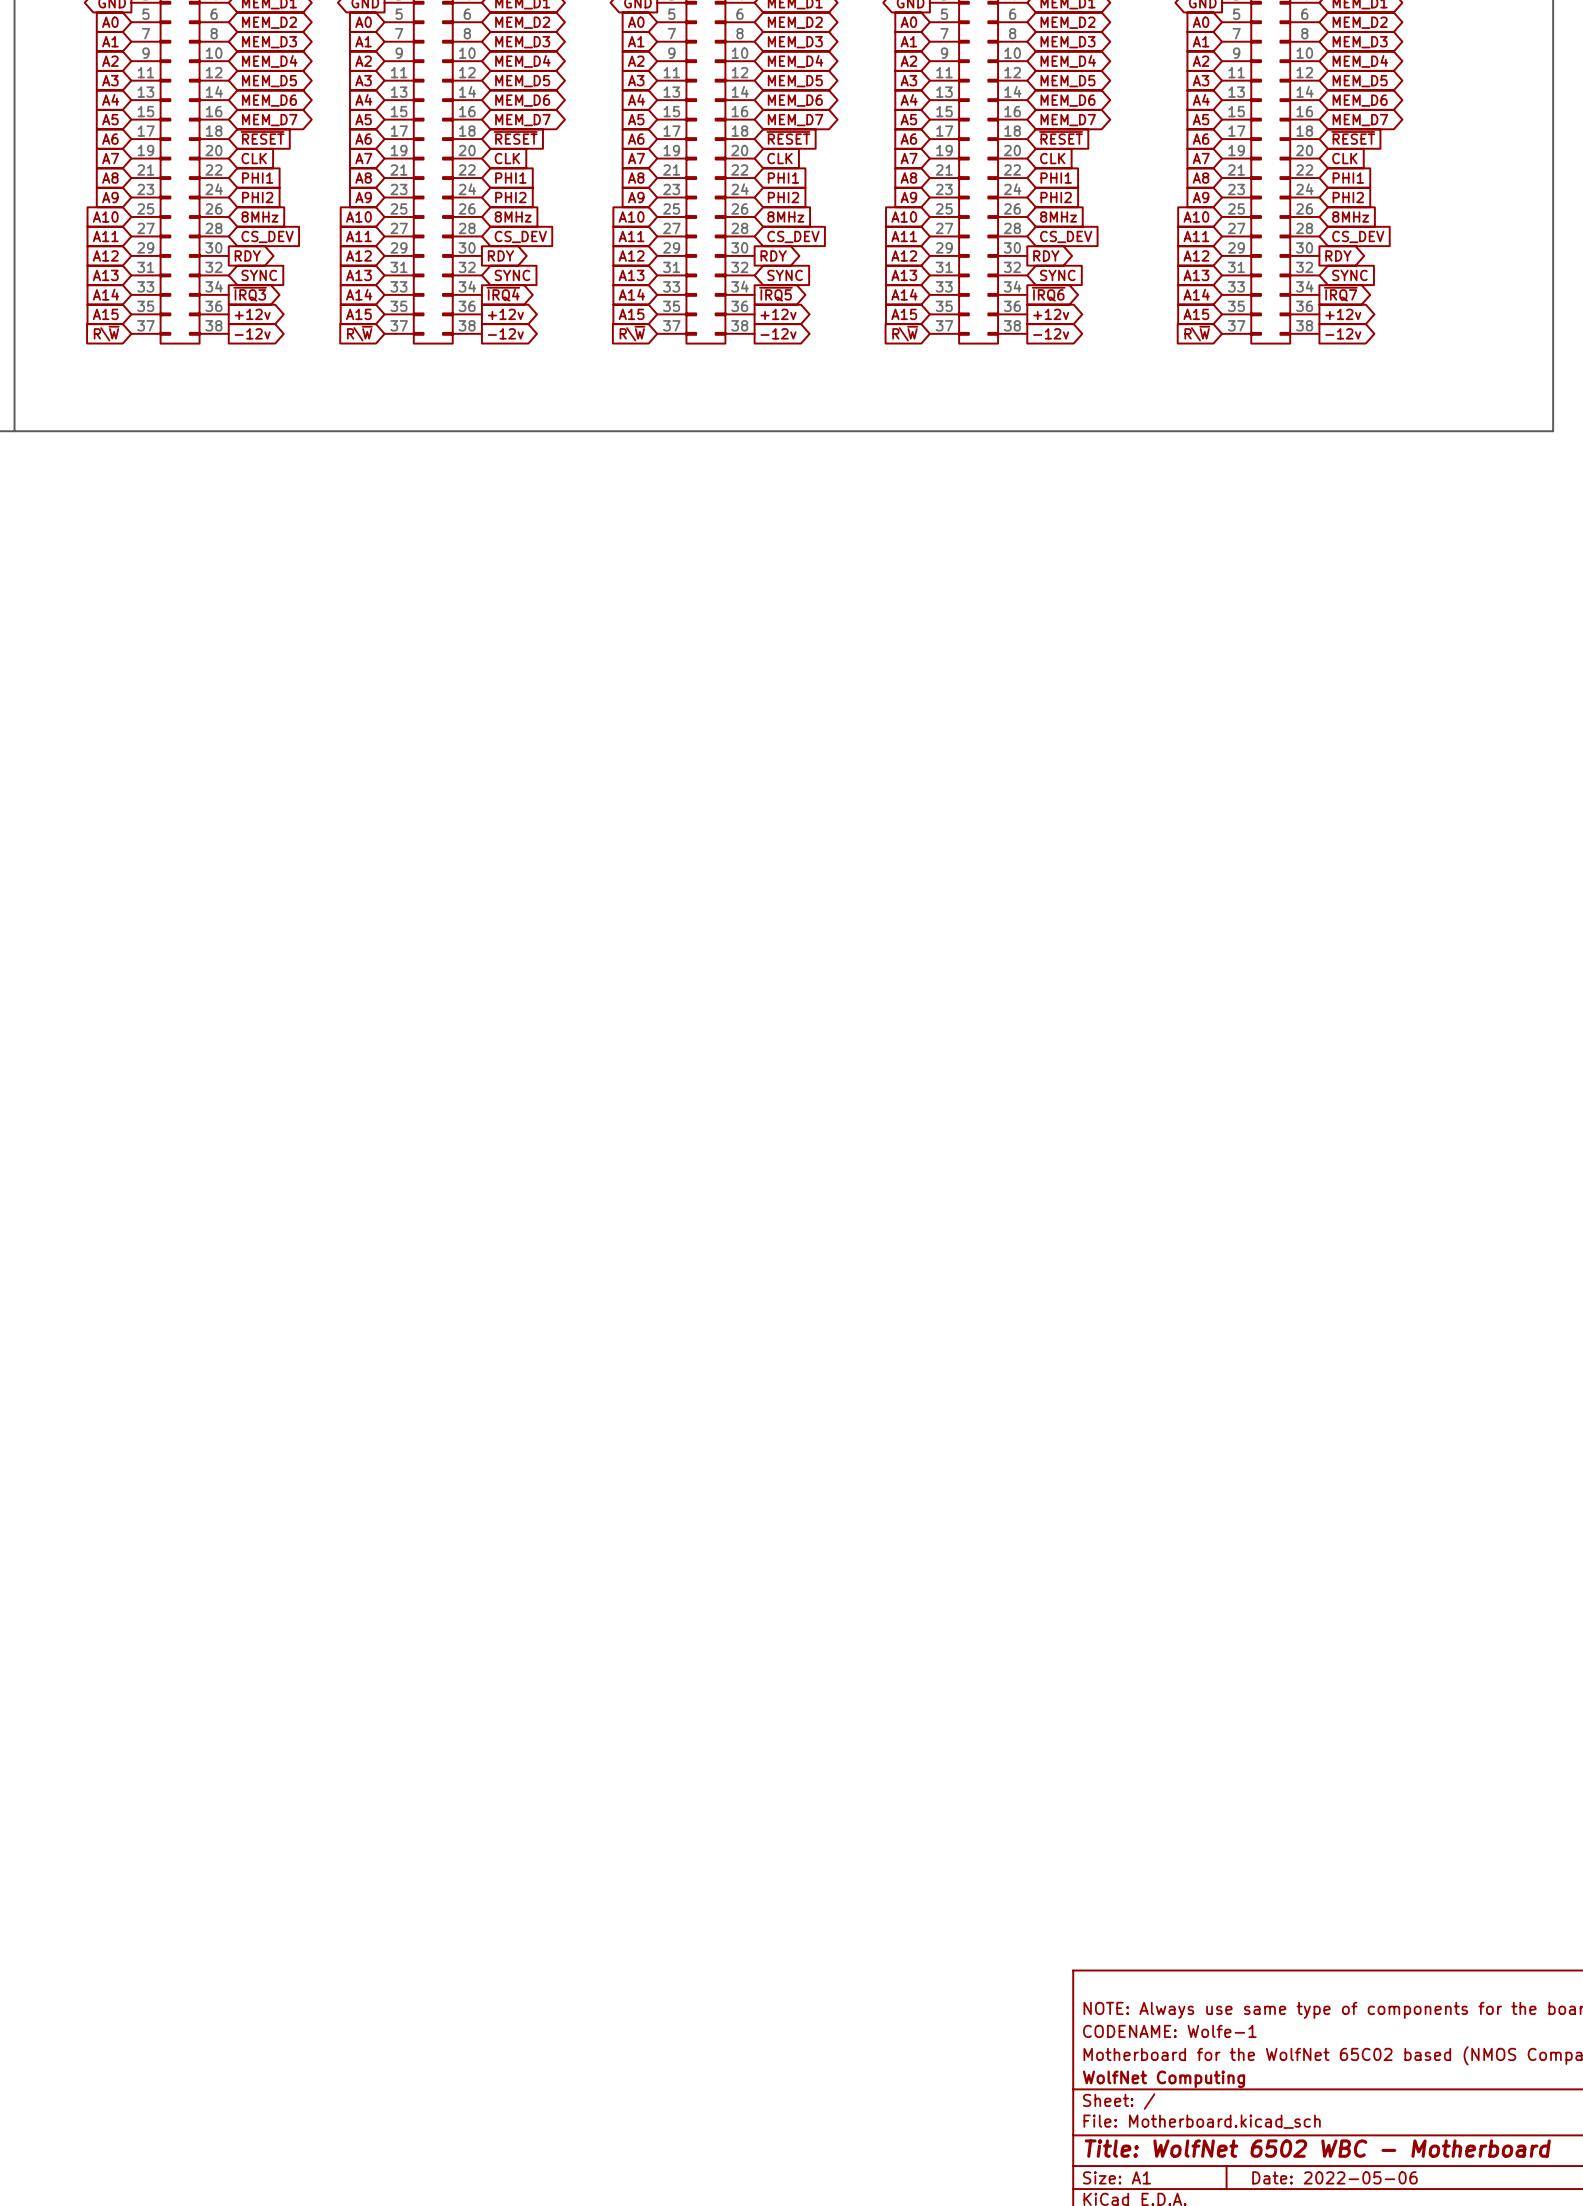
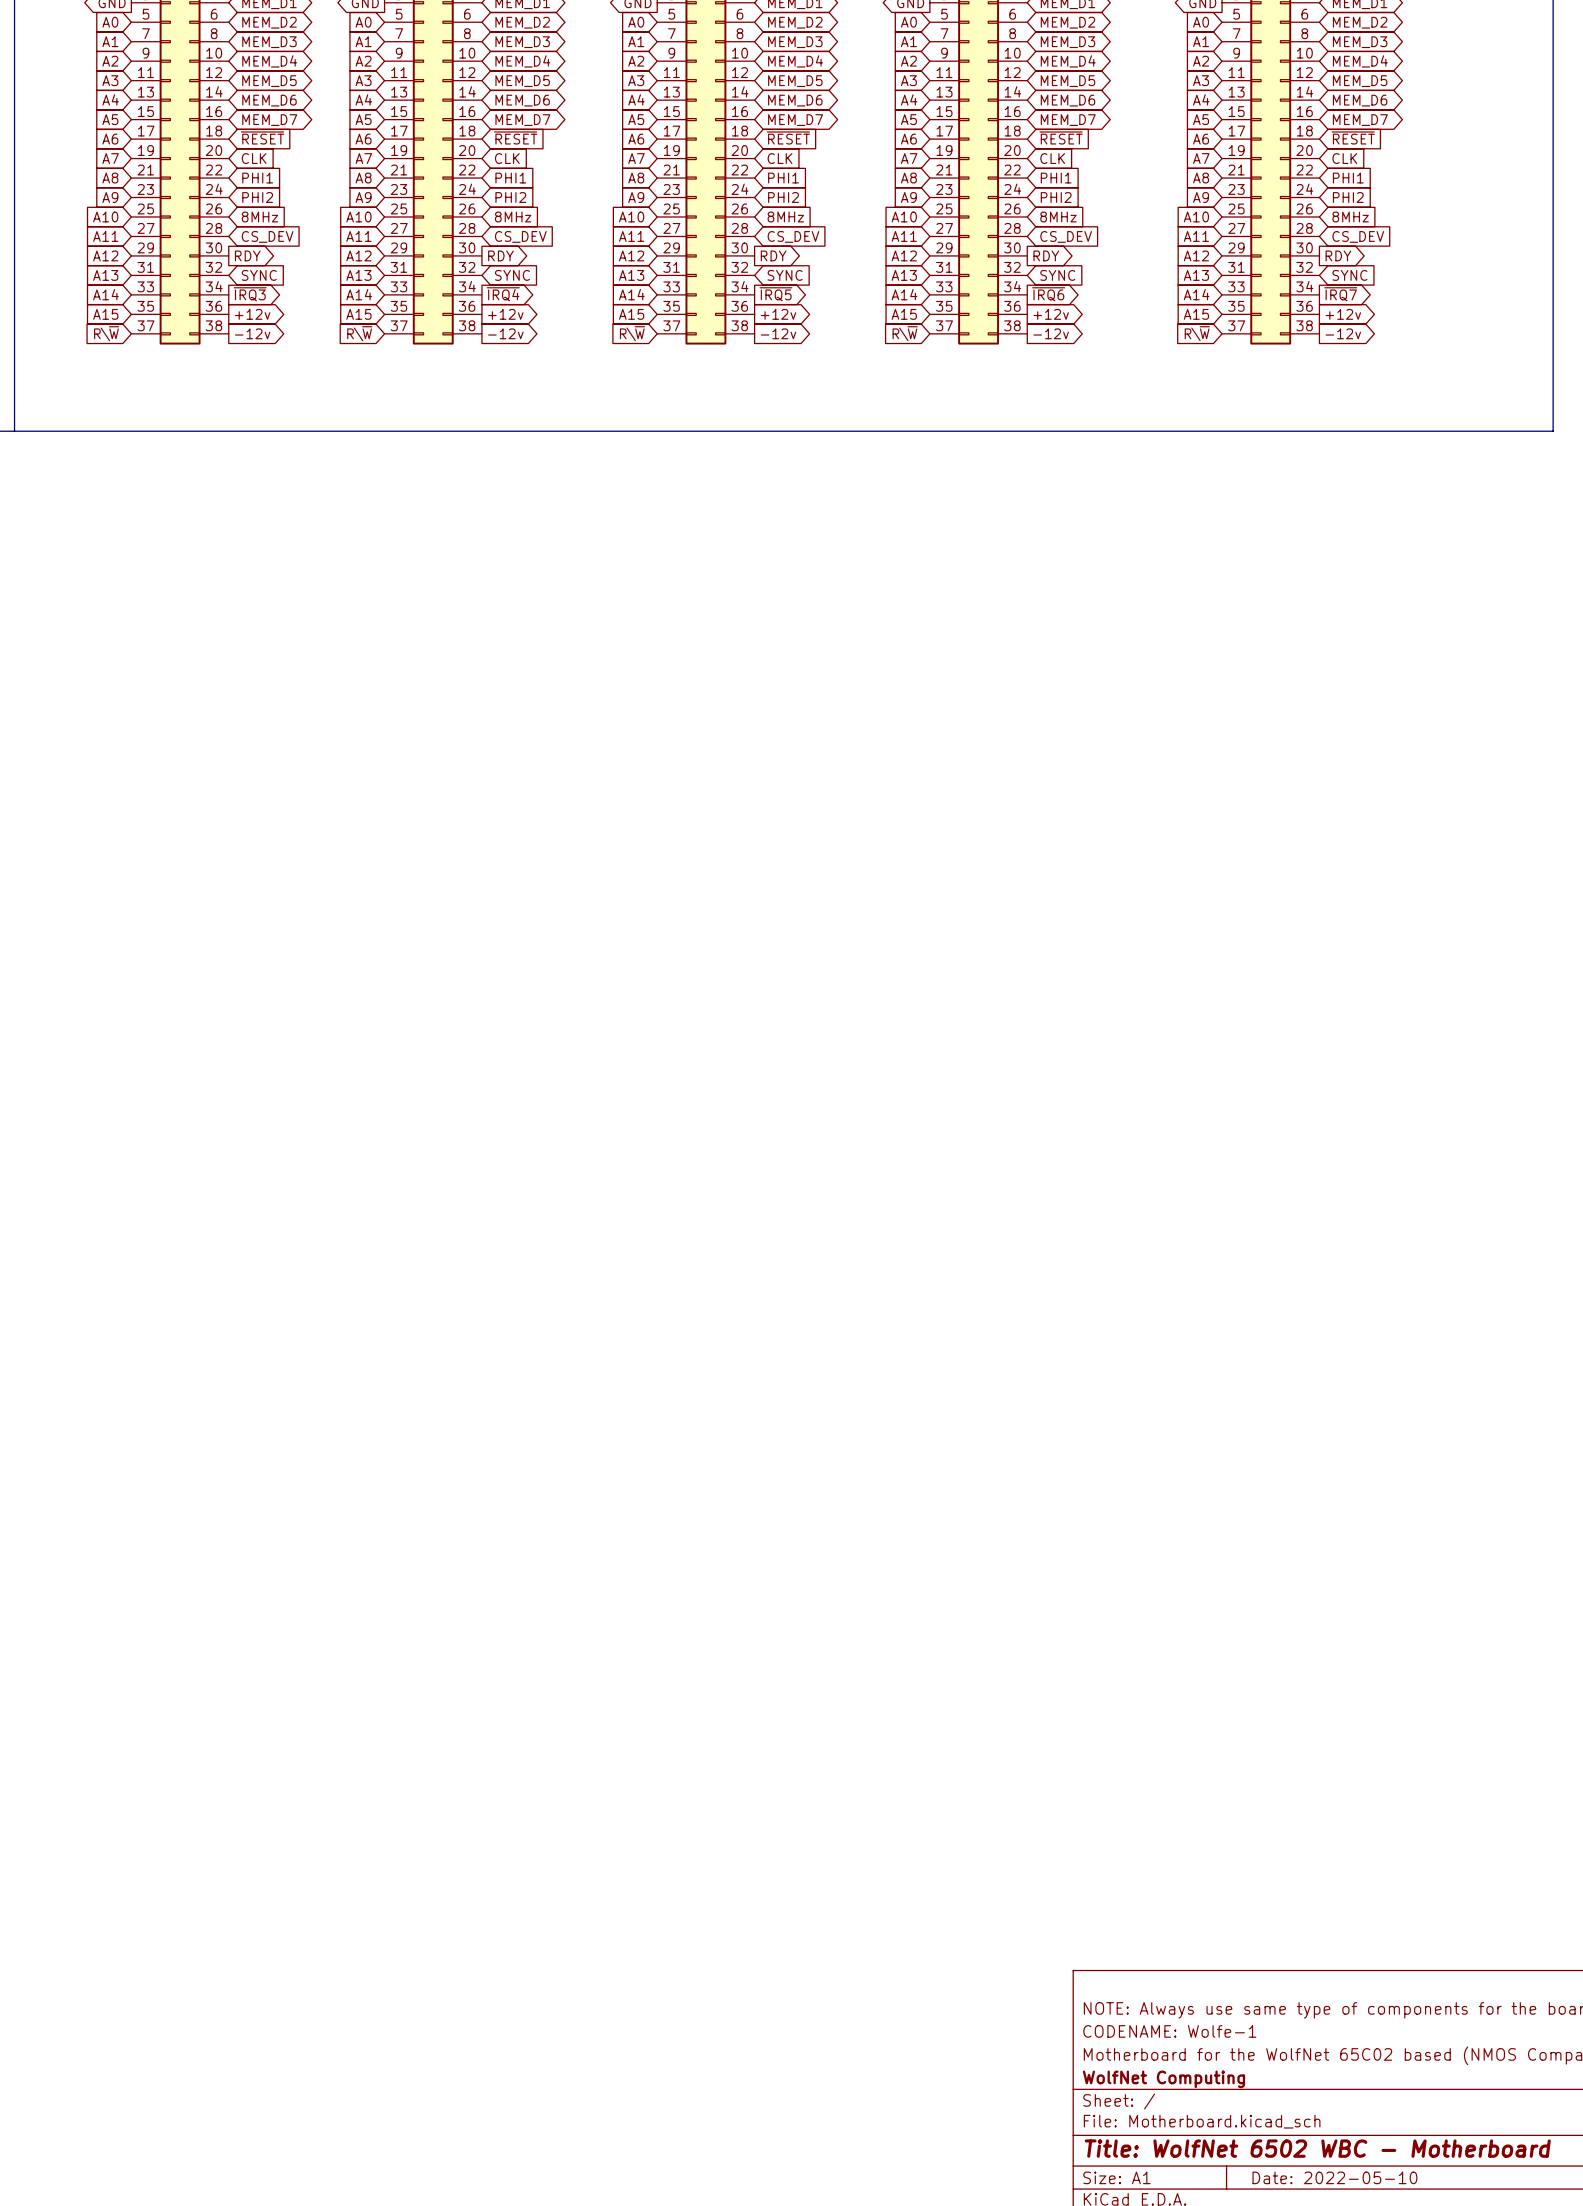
title block: Date: 2022-05-06 (1334, 2177) -> Date: 2022-05-10 (1334, 2177)

